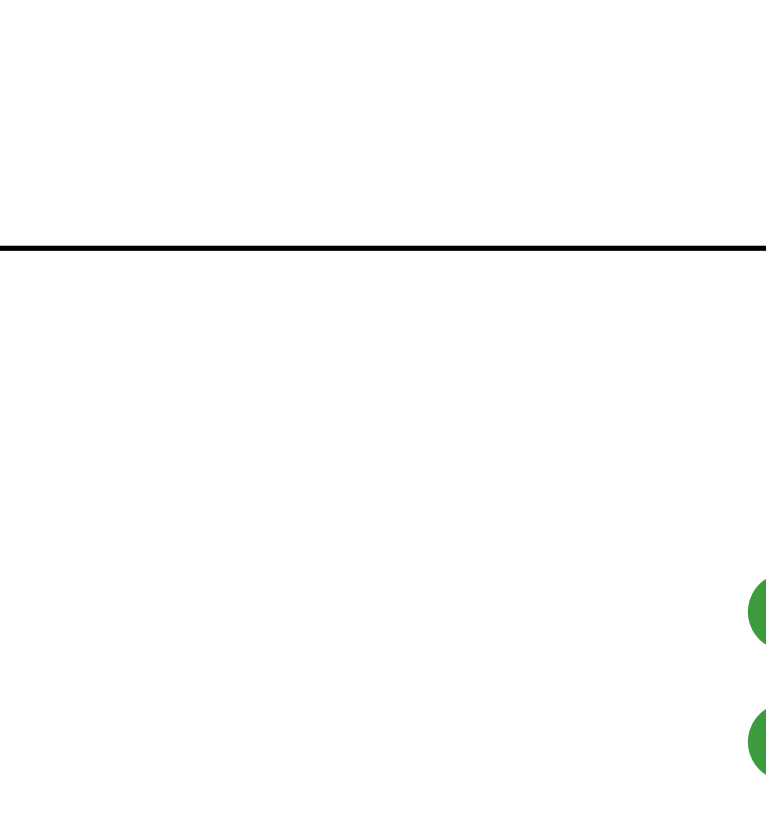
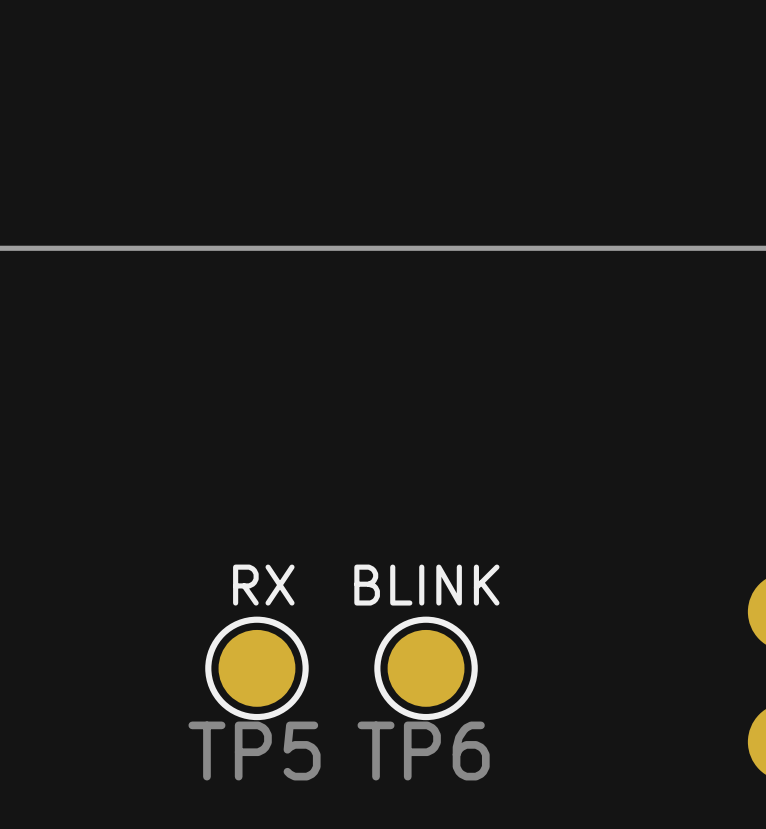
text: none -> RX (263, 585)
text: none -> BLINK (426, 585)
TP5: none -> (256, 668)
TP6: none -> (426, 668)

